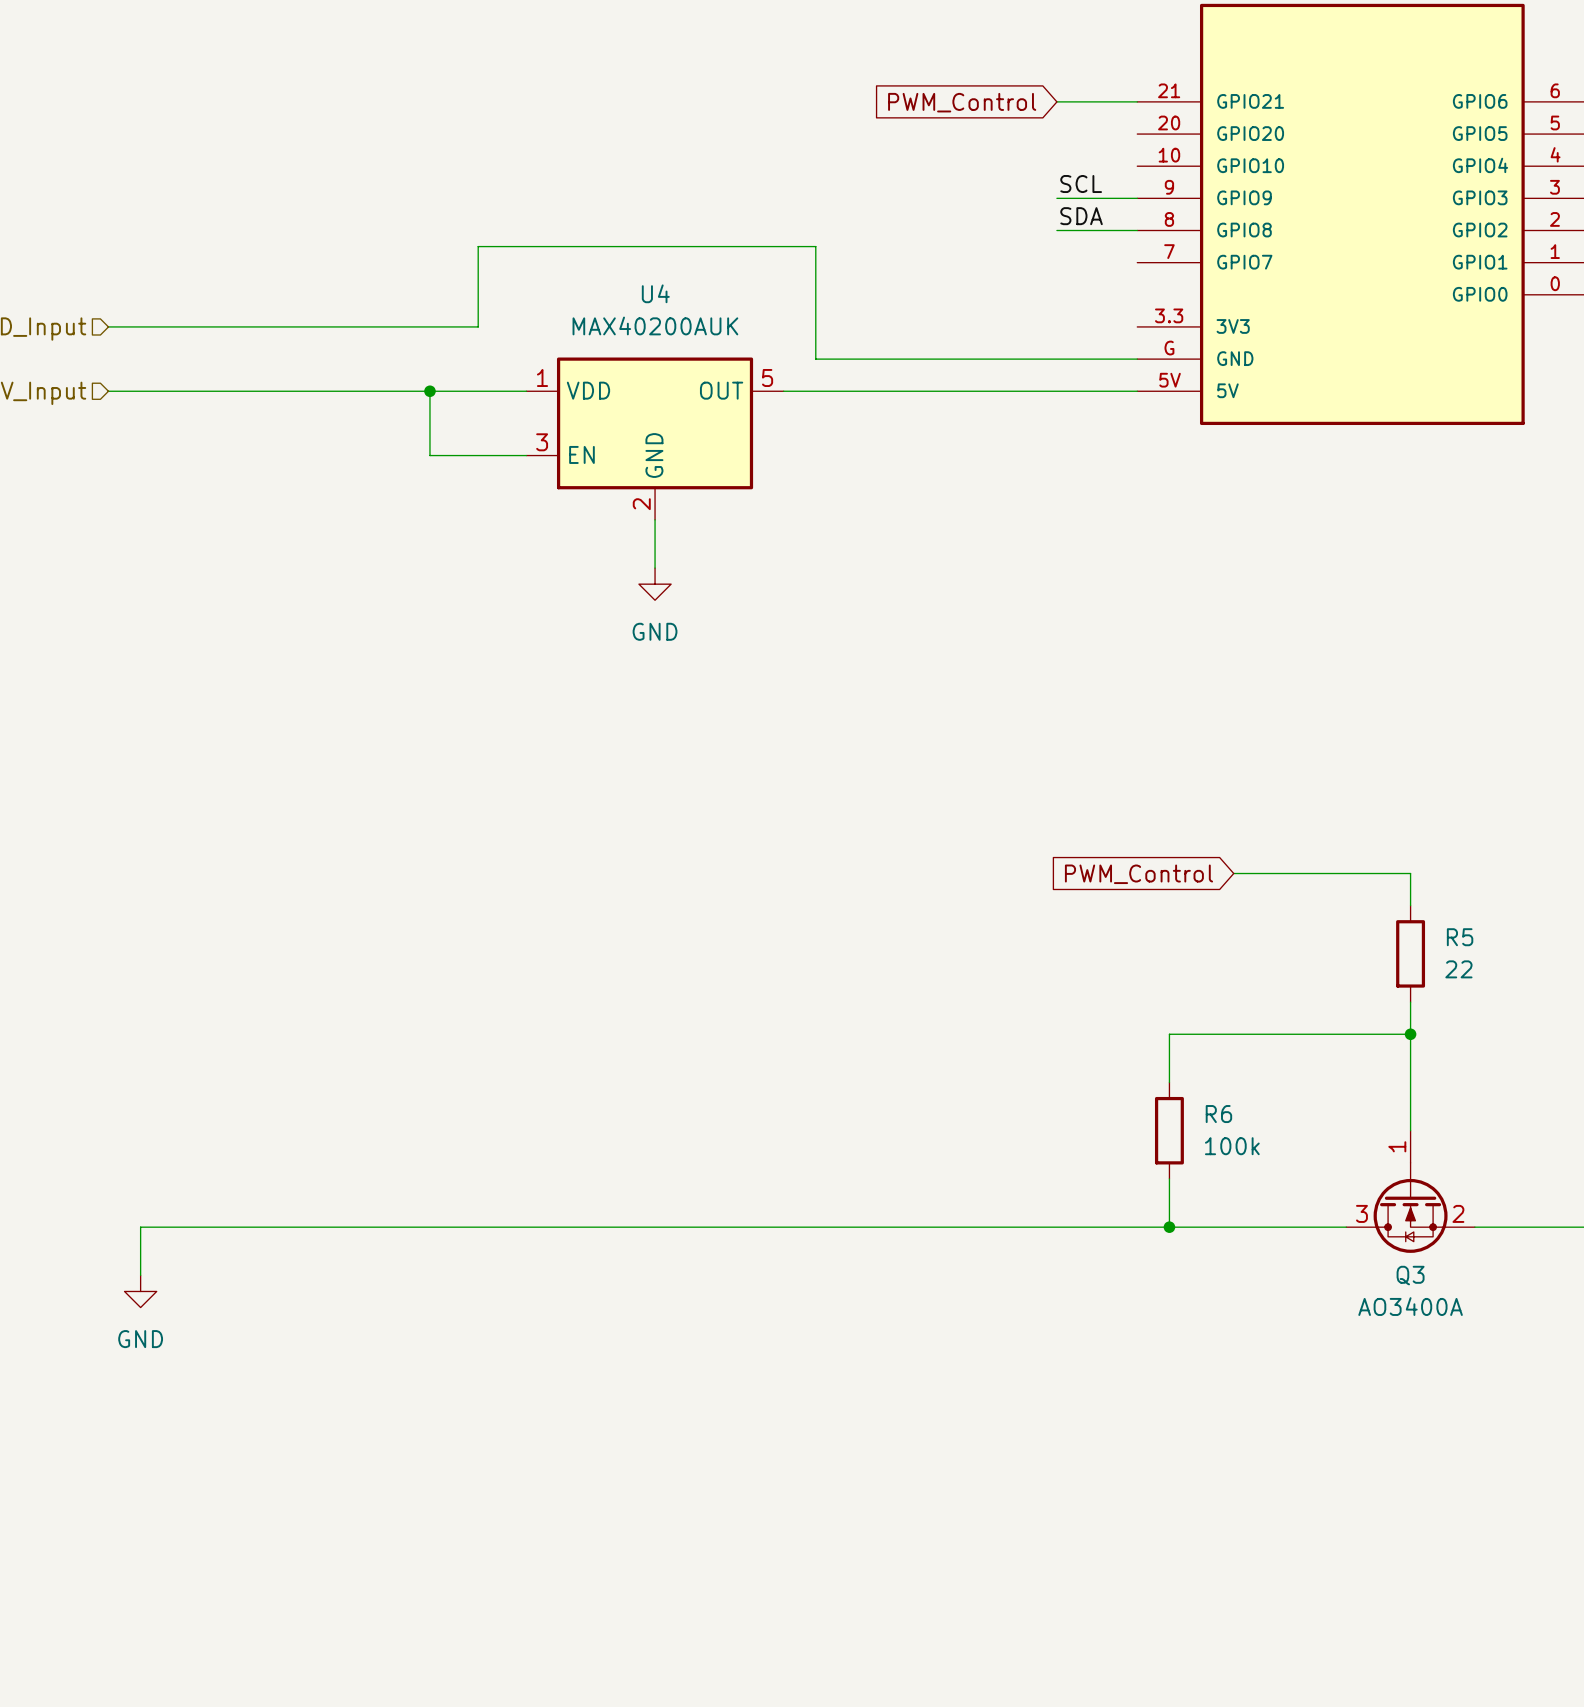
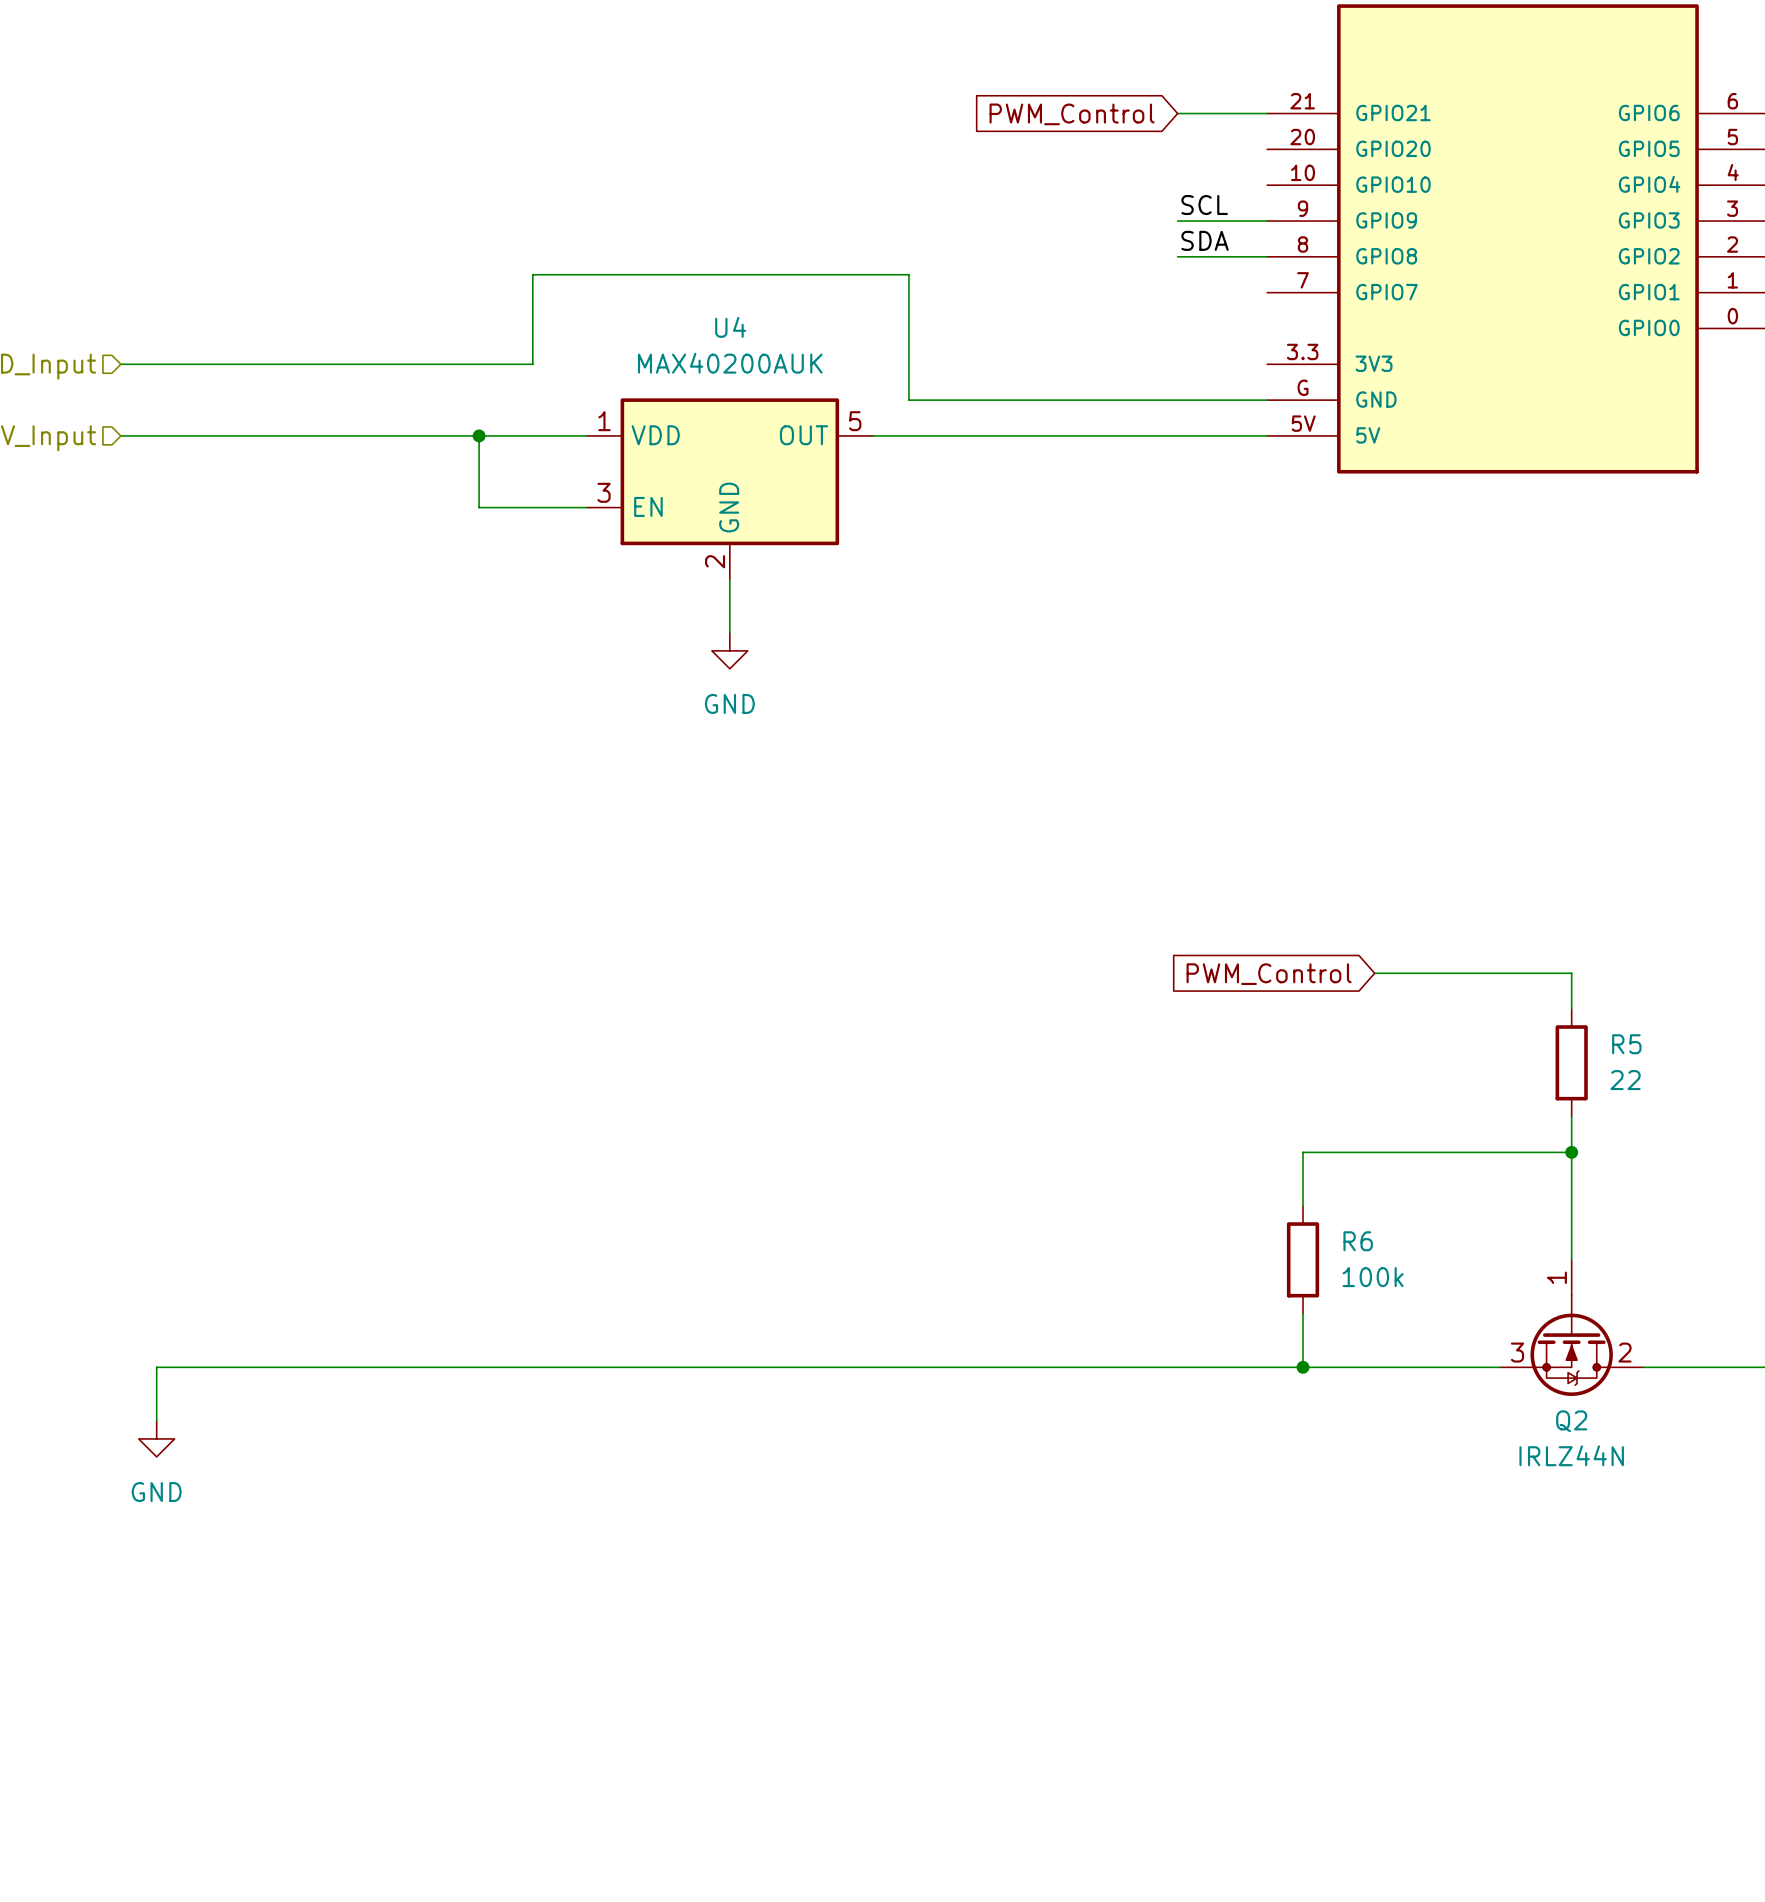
Q3: AO3400A (1410, 1191) -> none
Q2: none -> IRLZ44N (1571, 1327)

